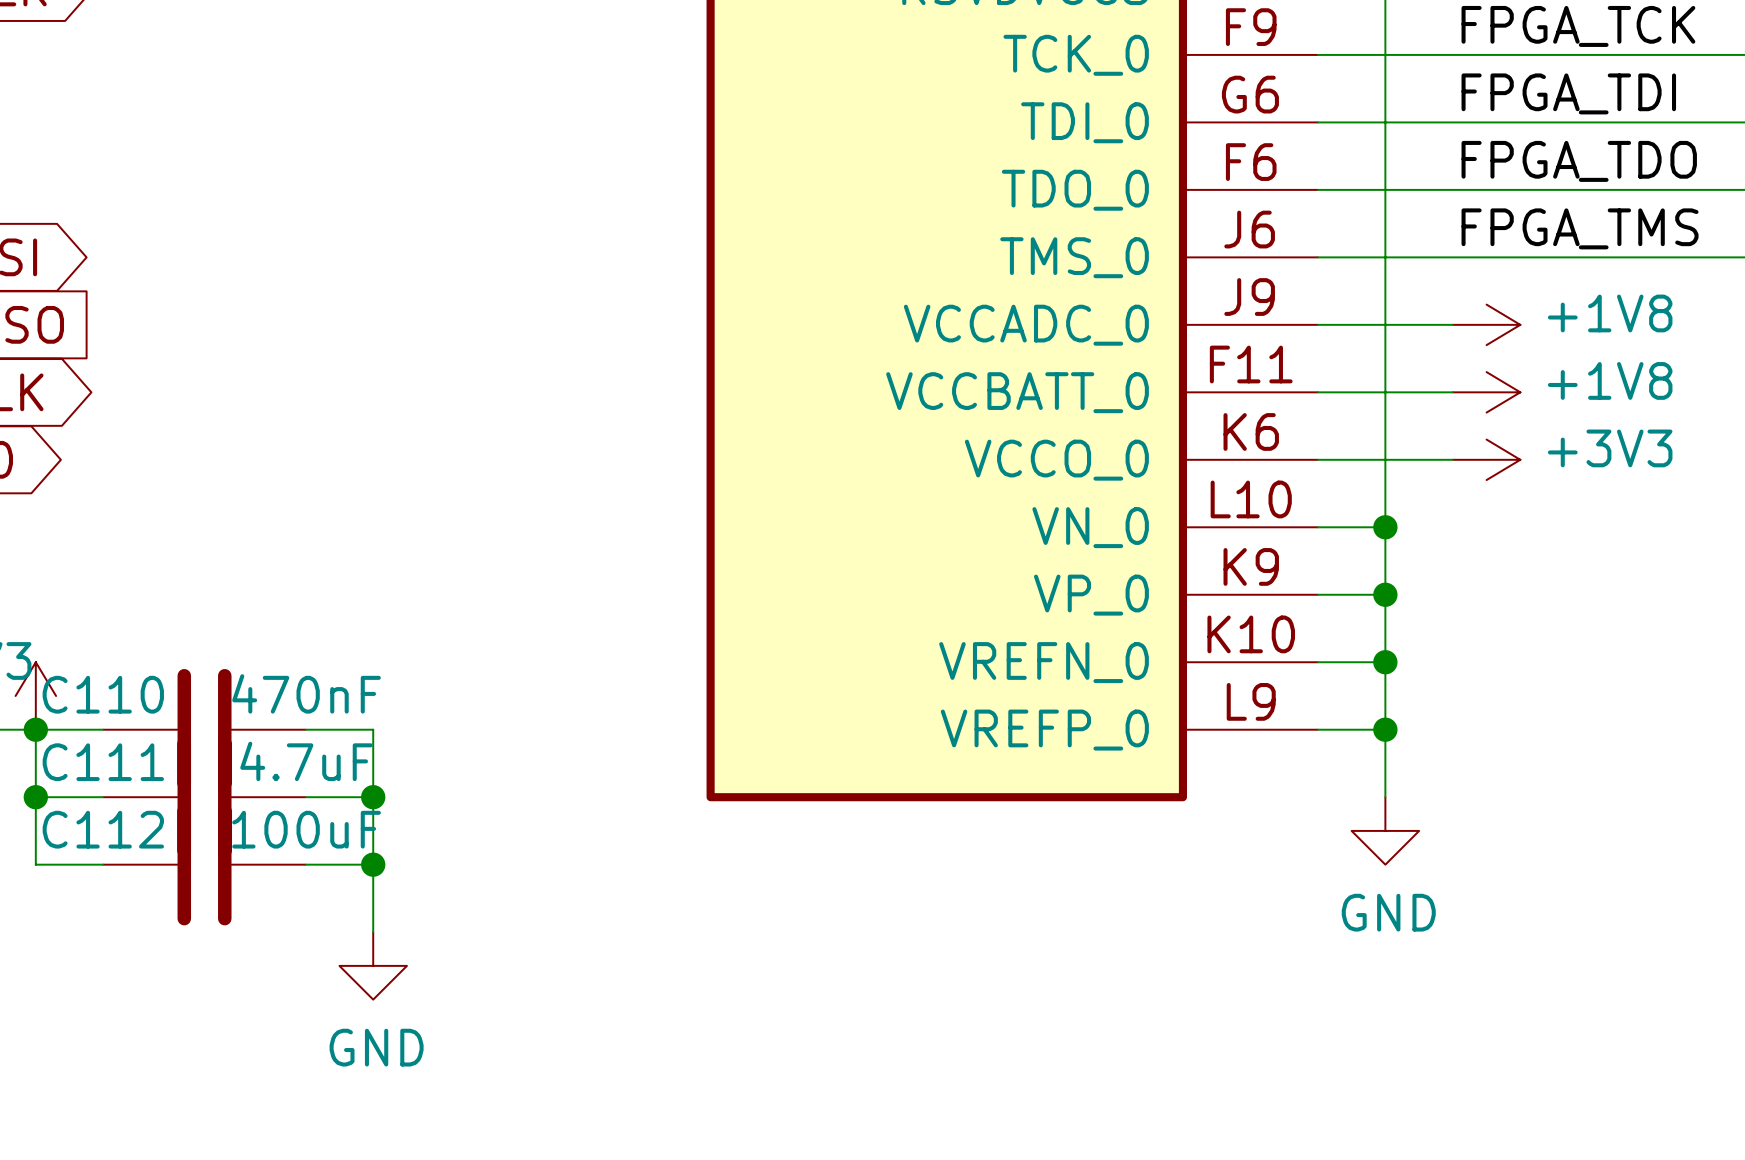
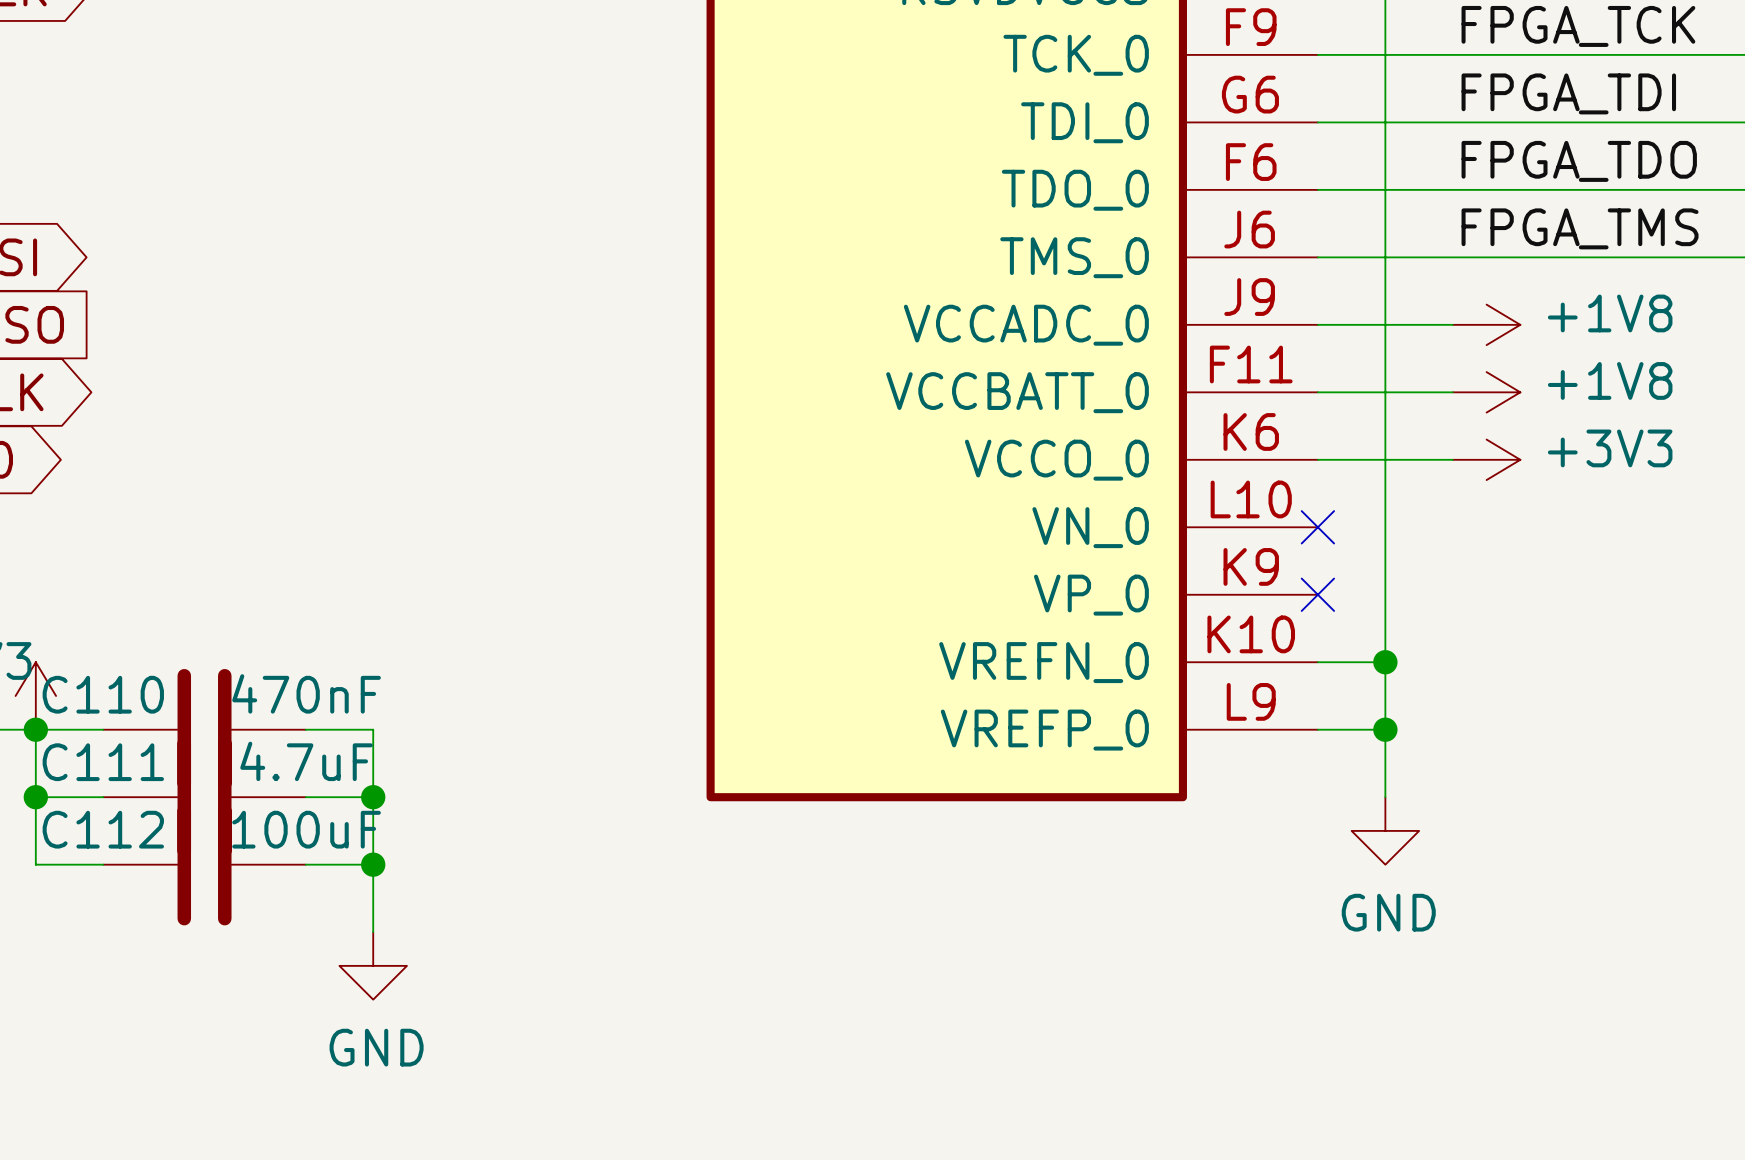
wire: (1317, 527) (1385, 527) -> none
no-connect mark: none -> (1317, 527)
junction: (1385, 527) -> none
wire: (1317, 594) (1385, 594) -> none
no-connect mark: none -> (1317, 594)
junction: (1385, 594) -> none

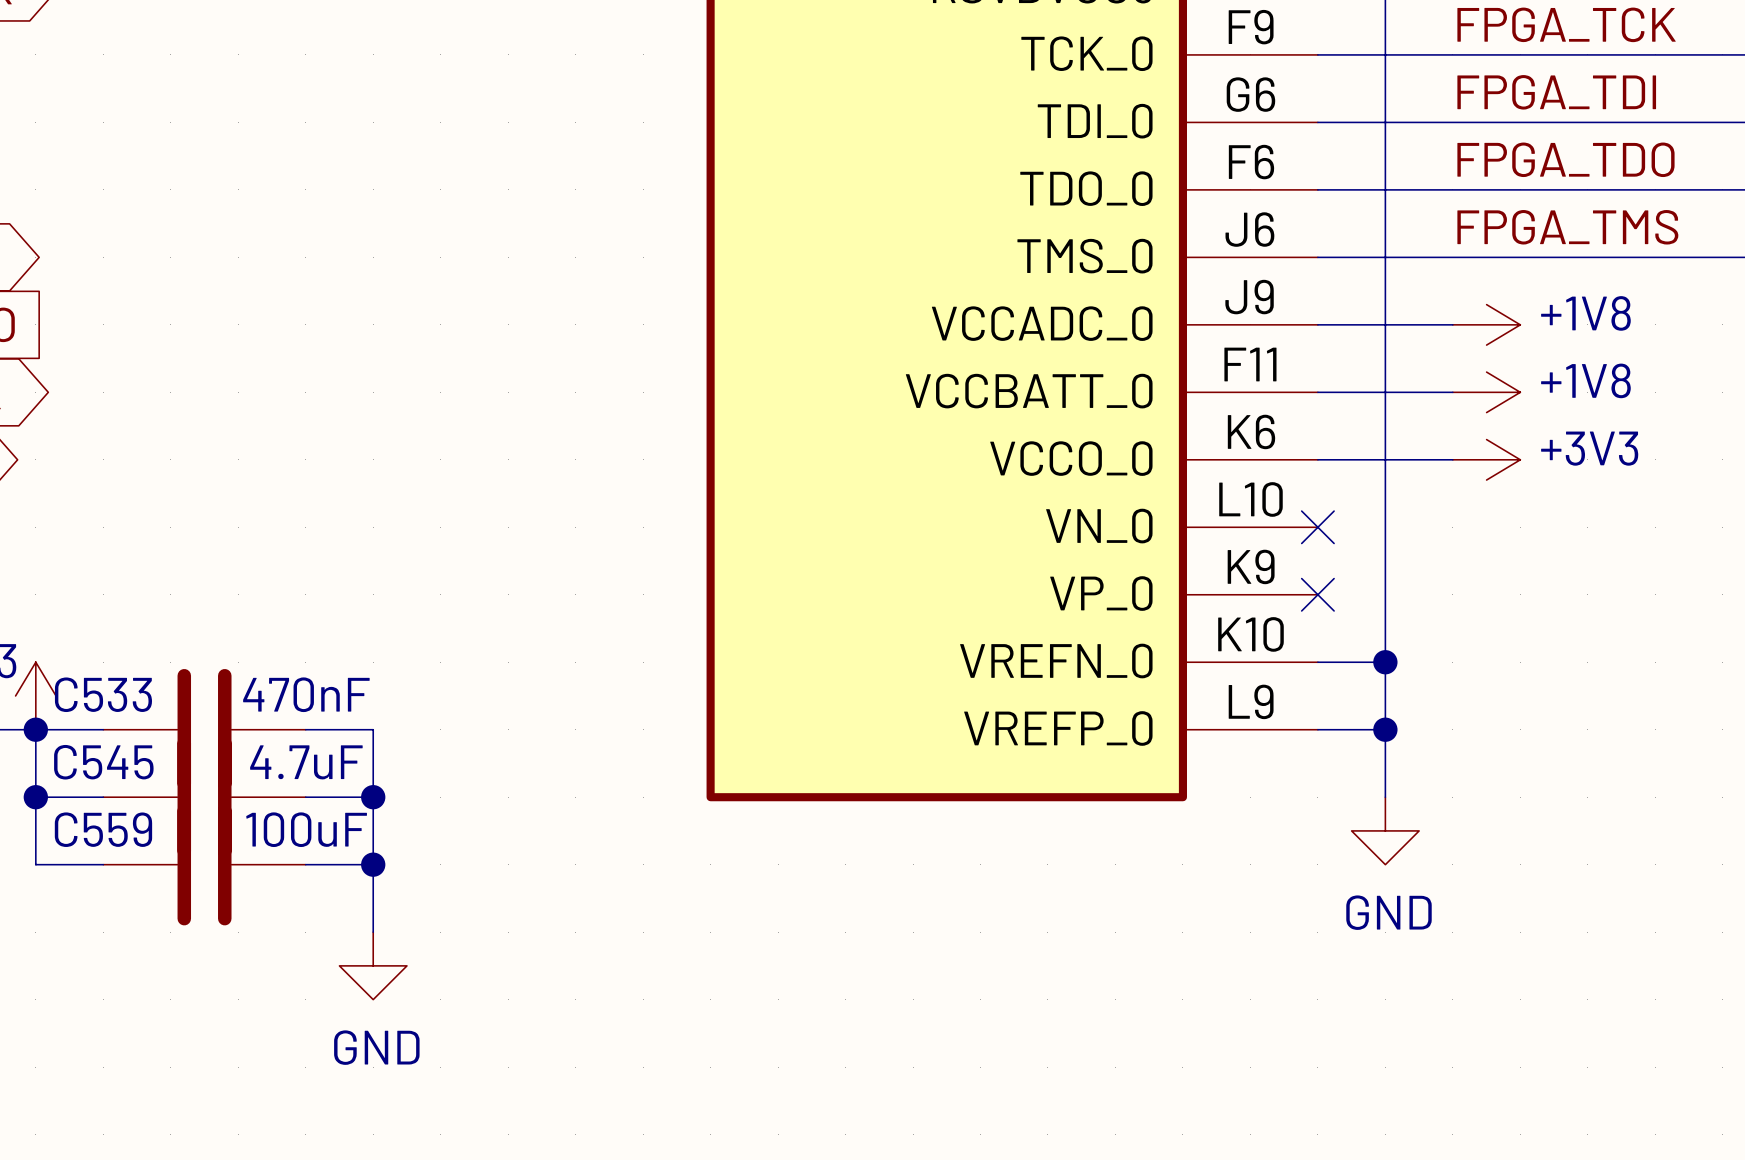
C110 name: C110 (103, 694) -> C533 (103, 694)
C111 name: C111 (103, 762) -> C545 (103, 762)
C112 name: C112 (103, 829) -> C559 (103, 829)

